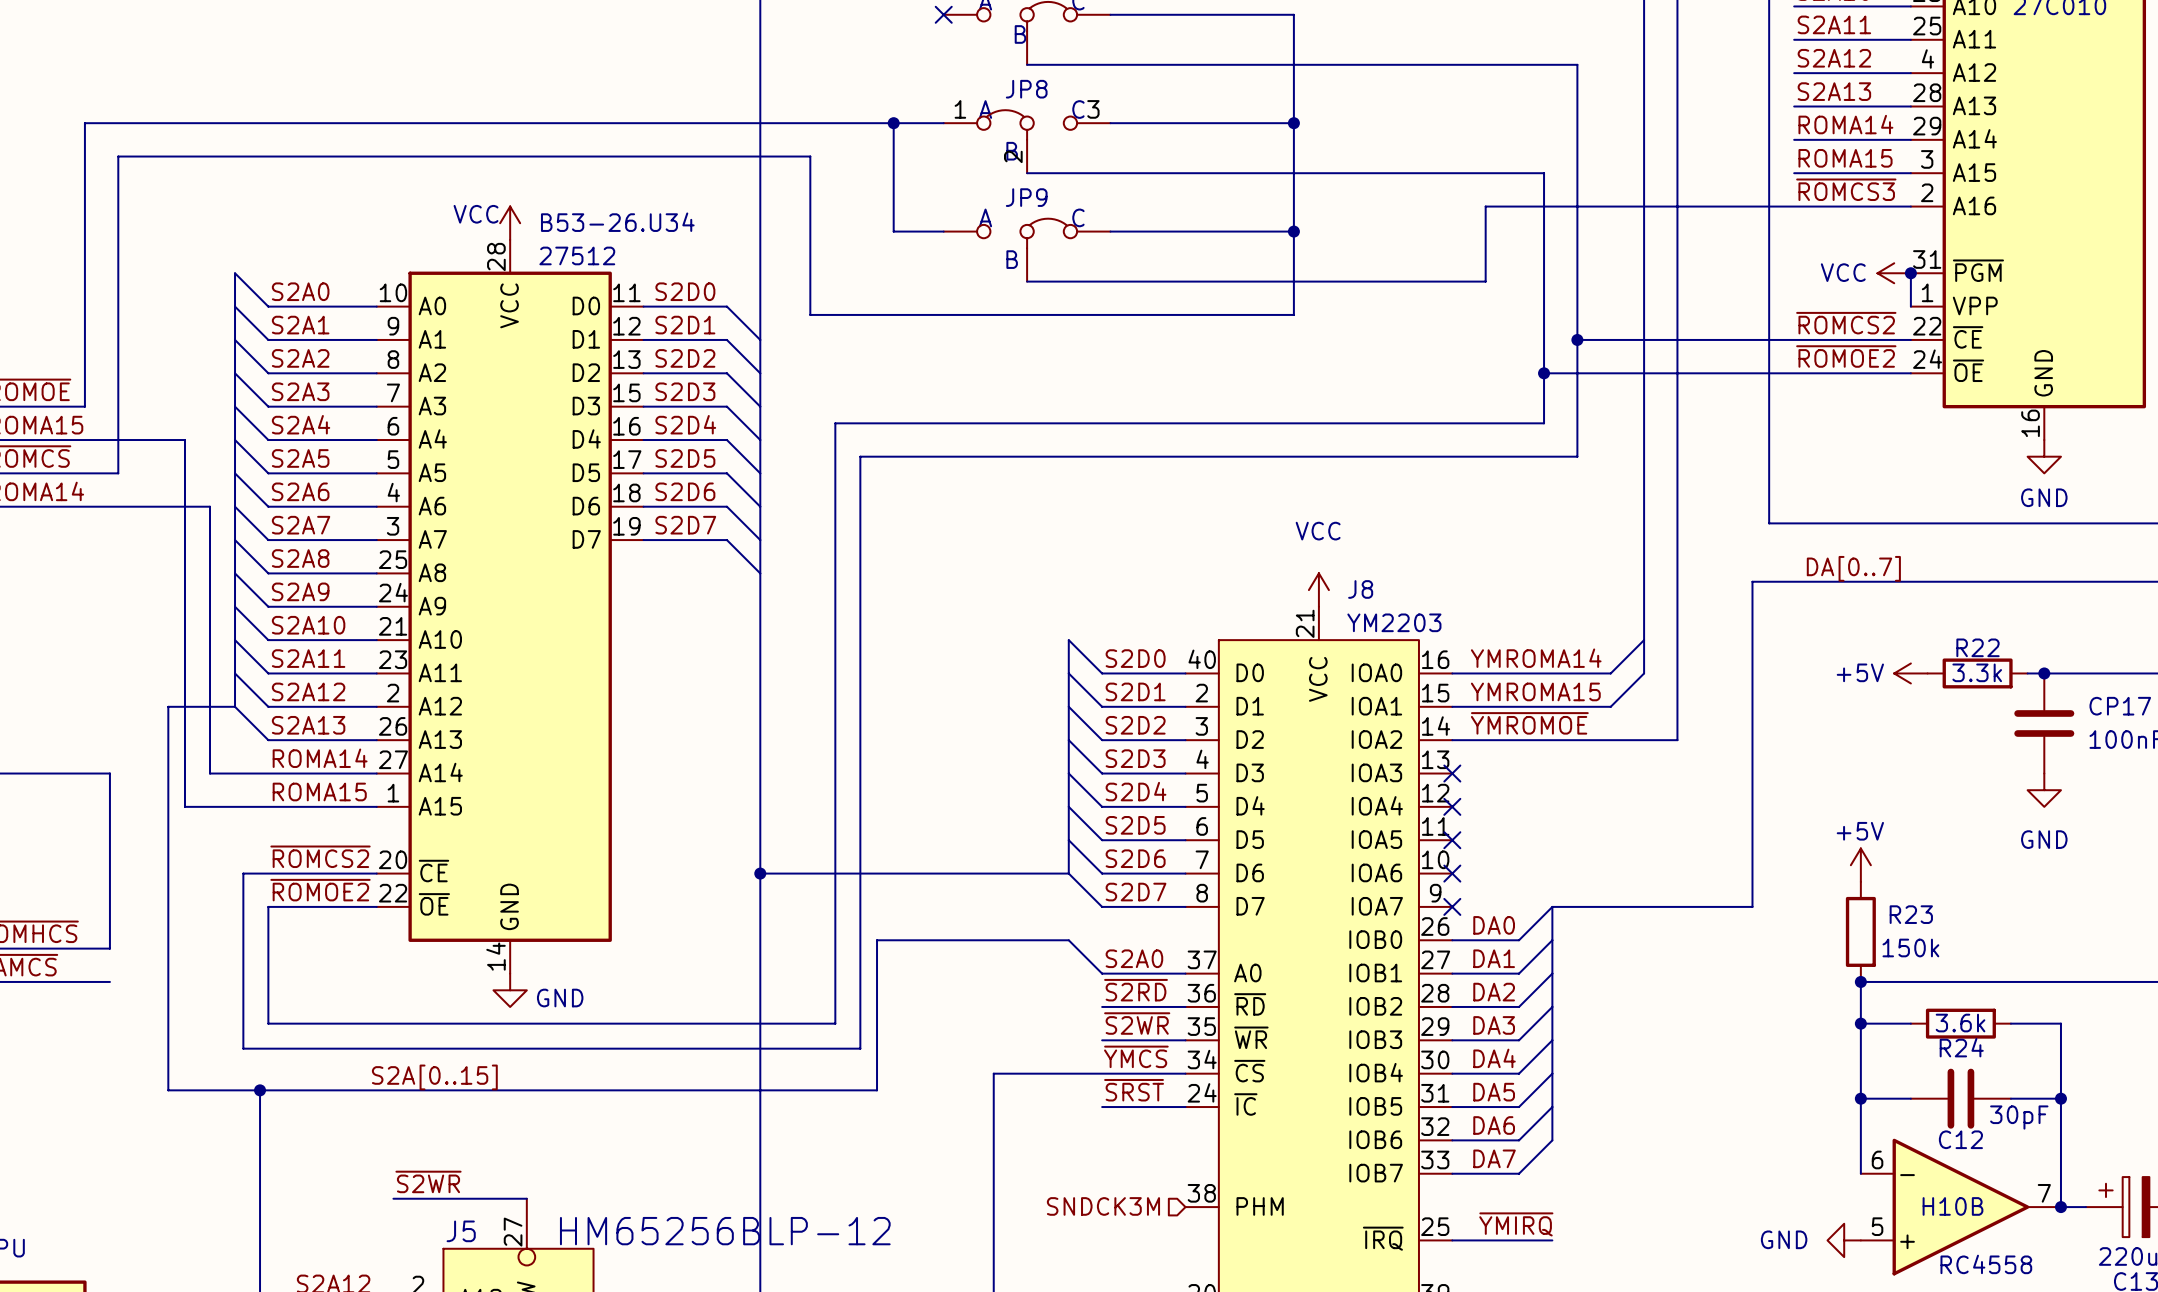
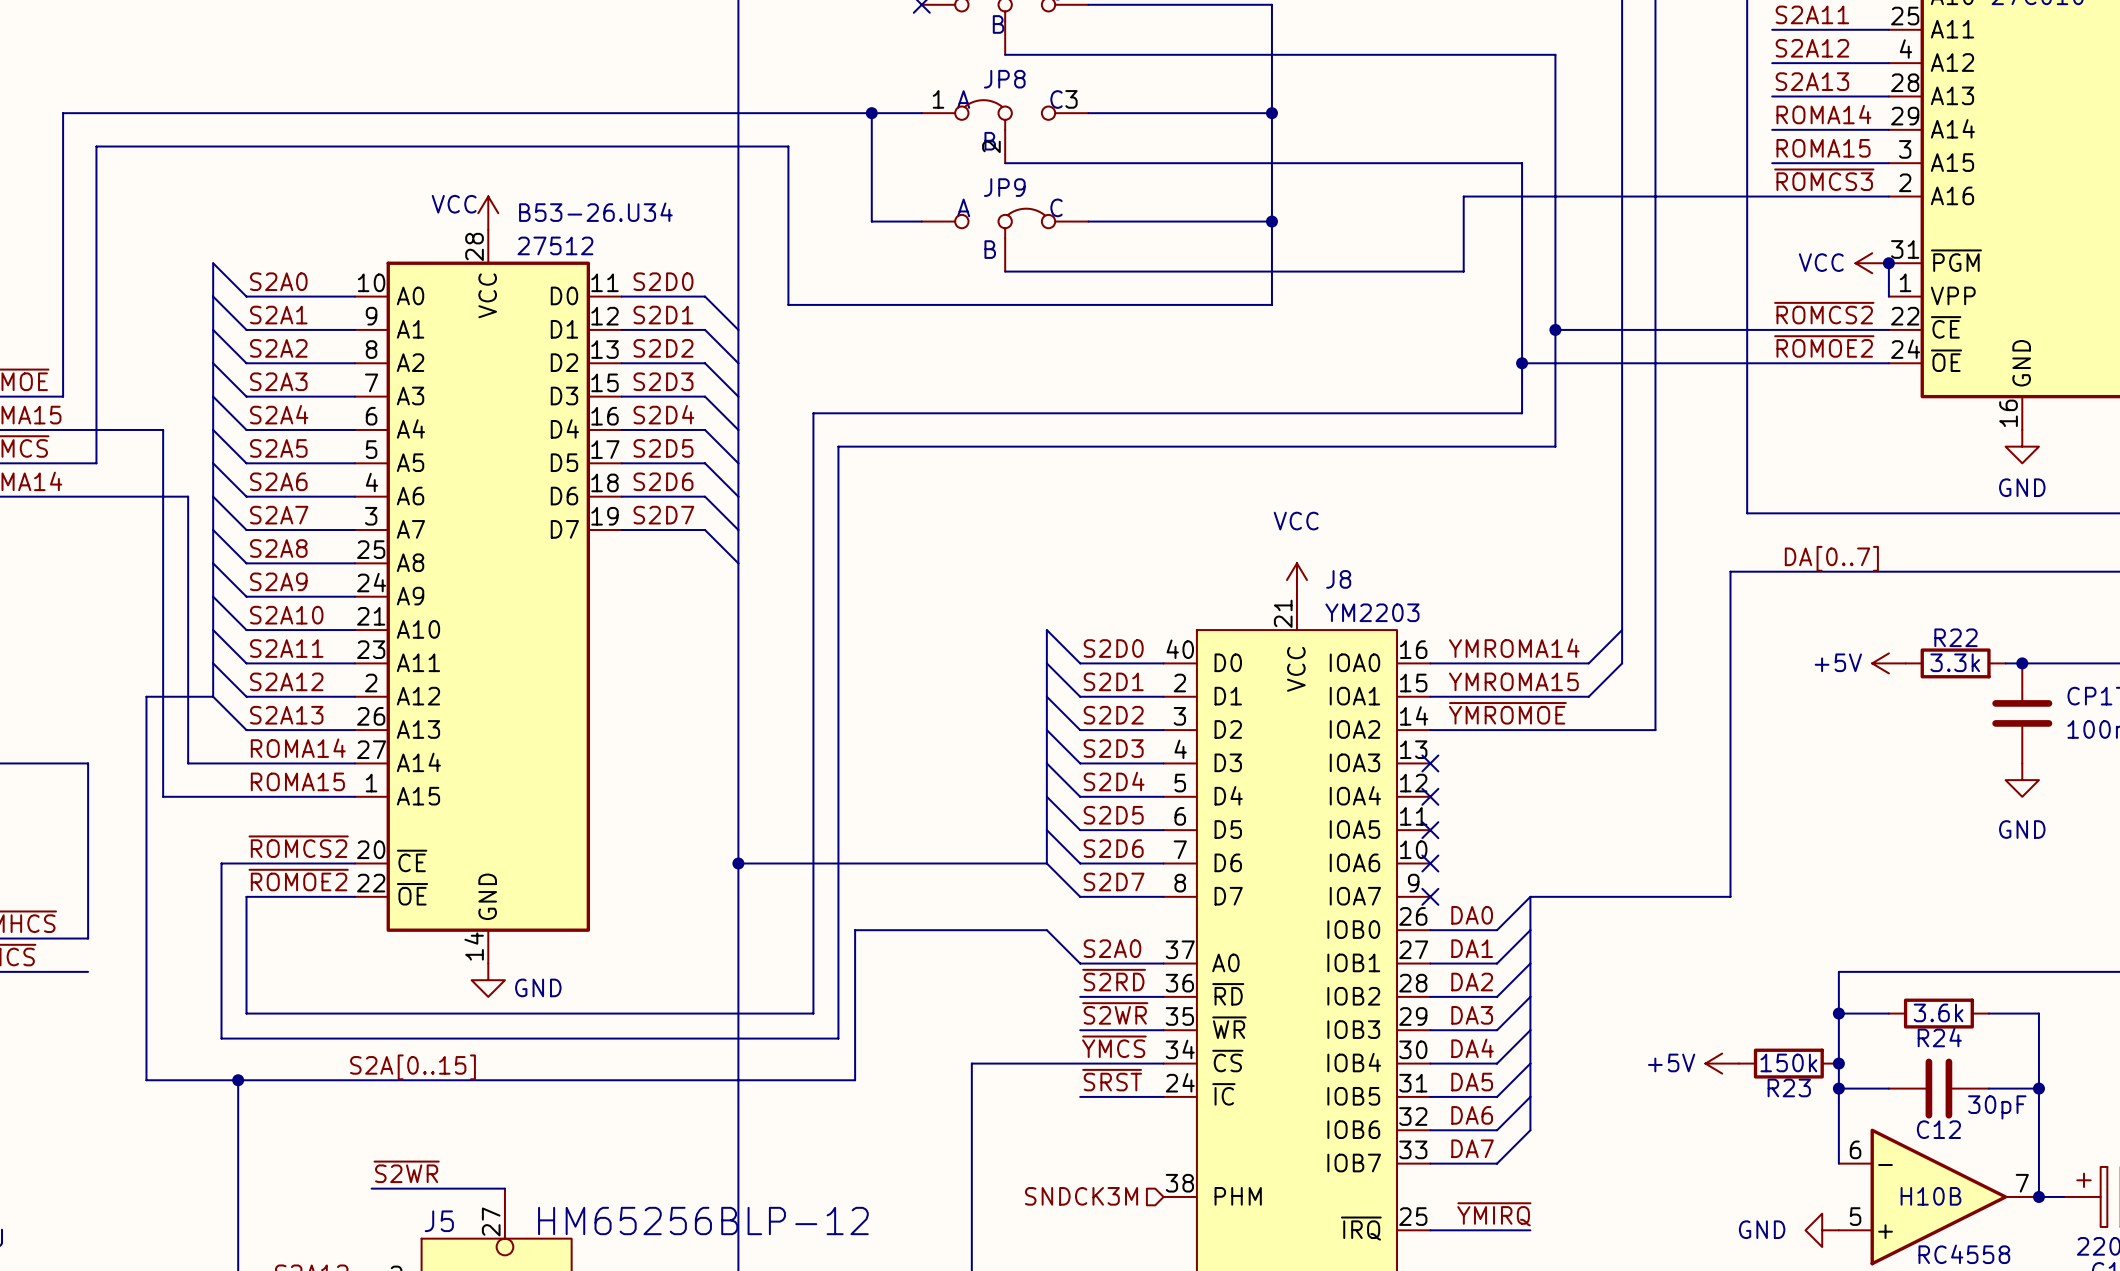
power symbol rotation: 0° (1860, 865) -> 90° counterclockwise (1722, 1063)
power symbol position: +5V (1860, 865) -> +5V (1722, 1063)
R23 name position: R23 (1911, 914) -> R23 (1789, 1087)
R23 rotation: 0° (1860, 931) -> 90° clockwise (1788, 1063)
R23 position: (1860, 931) -> (1788, 1063)
R23 value position: 150k (1910, 947) -> 150k (1788, 1062)
junction: (1860, 981) -> none
junction: none -> (1838, 1063)

